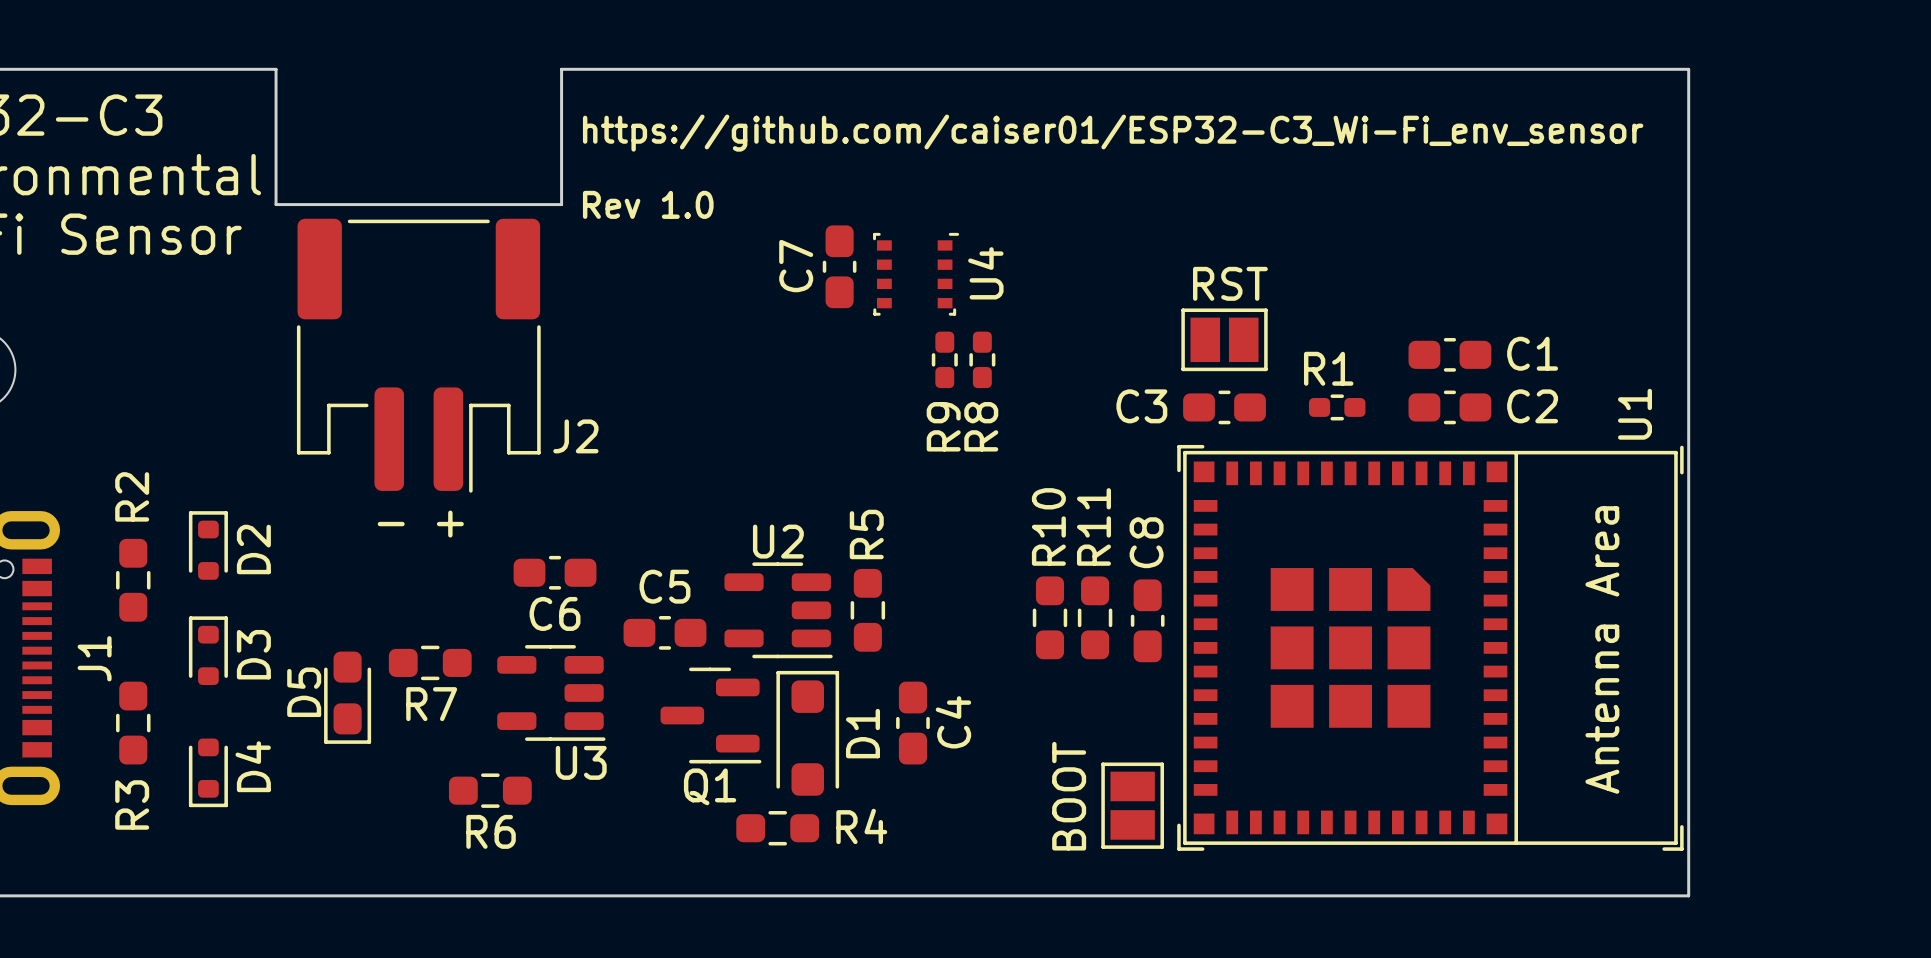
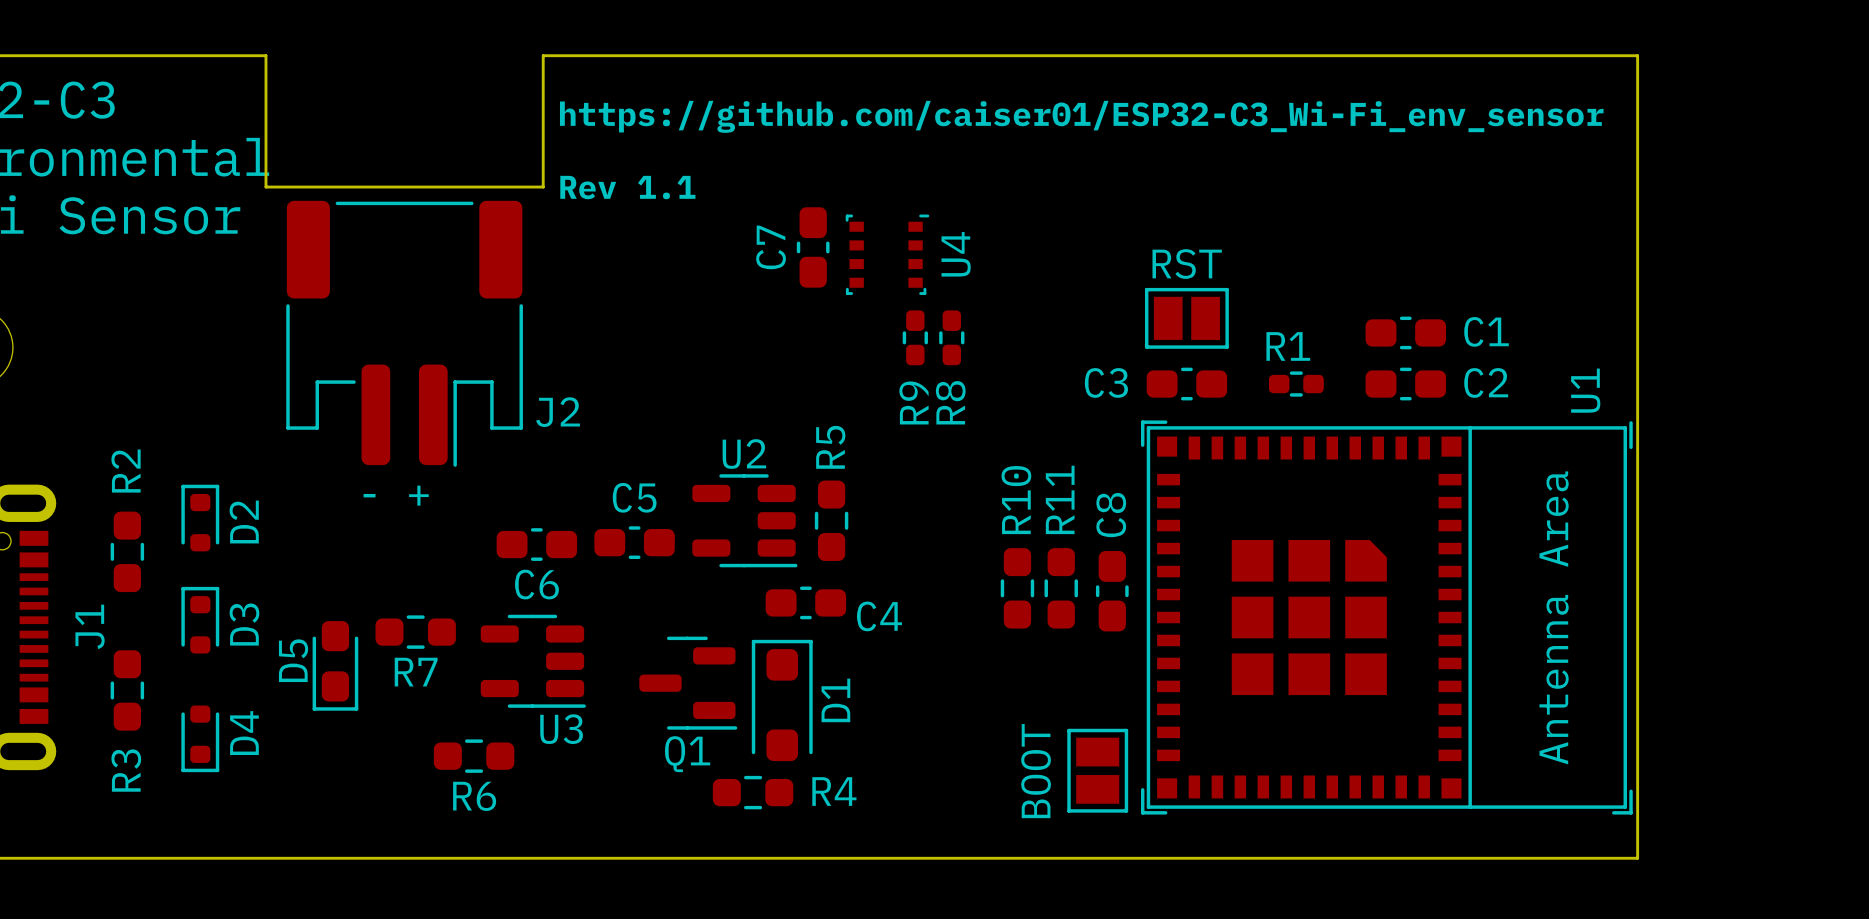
text: Rev 1.0 (648, 204) -> Rev 1.1 (627, 187)
U2 position: (778, 610) -> (744, 520)
R5 position: (867, 610) -> (831, 520)
C5 position: (664, 632) -> (634, 542)
C4 rotation: 0° (912, 723) -> 90° clockwise (805, 602)
C4 position: (912, 723) -> (805, 602)

